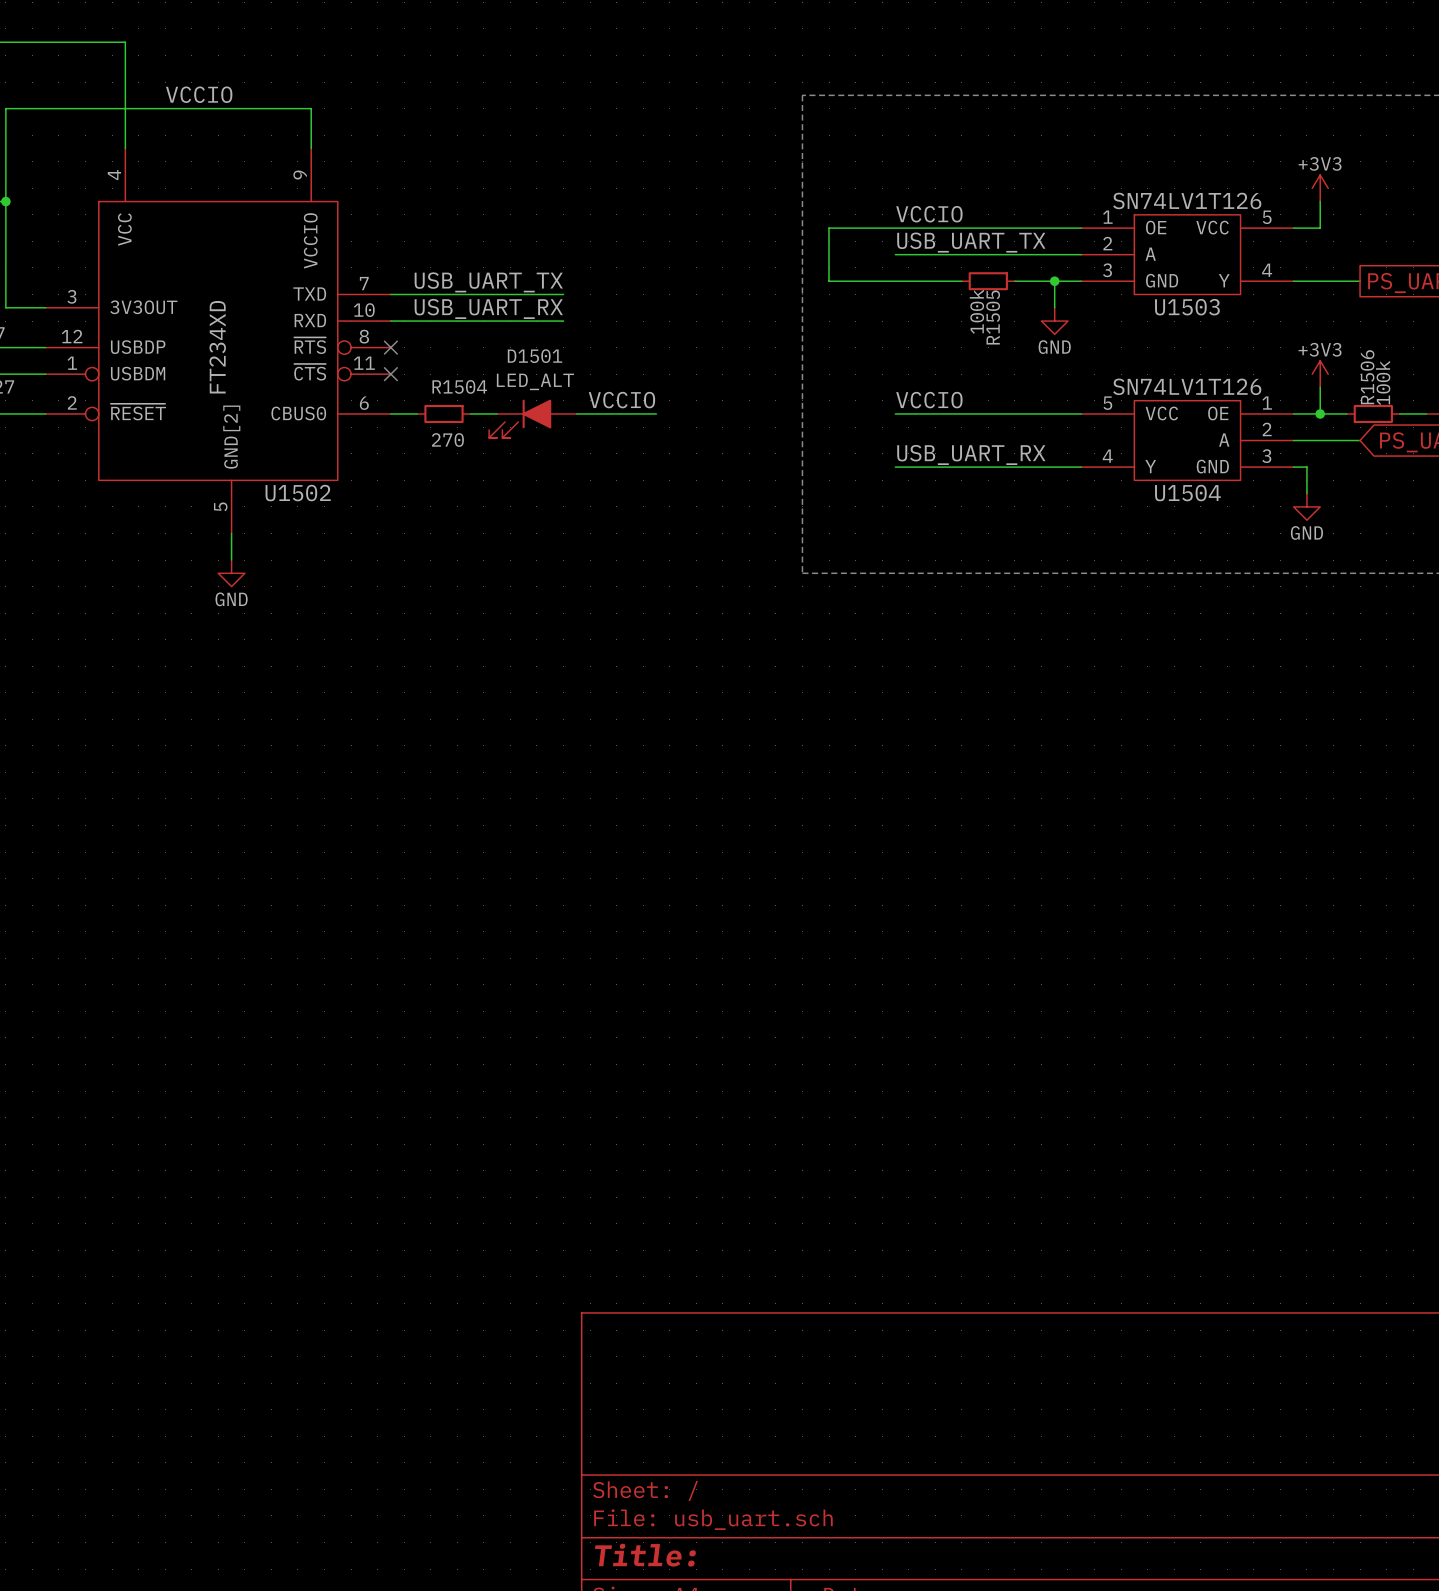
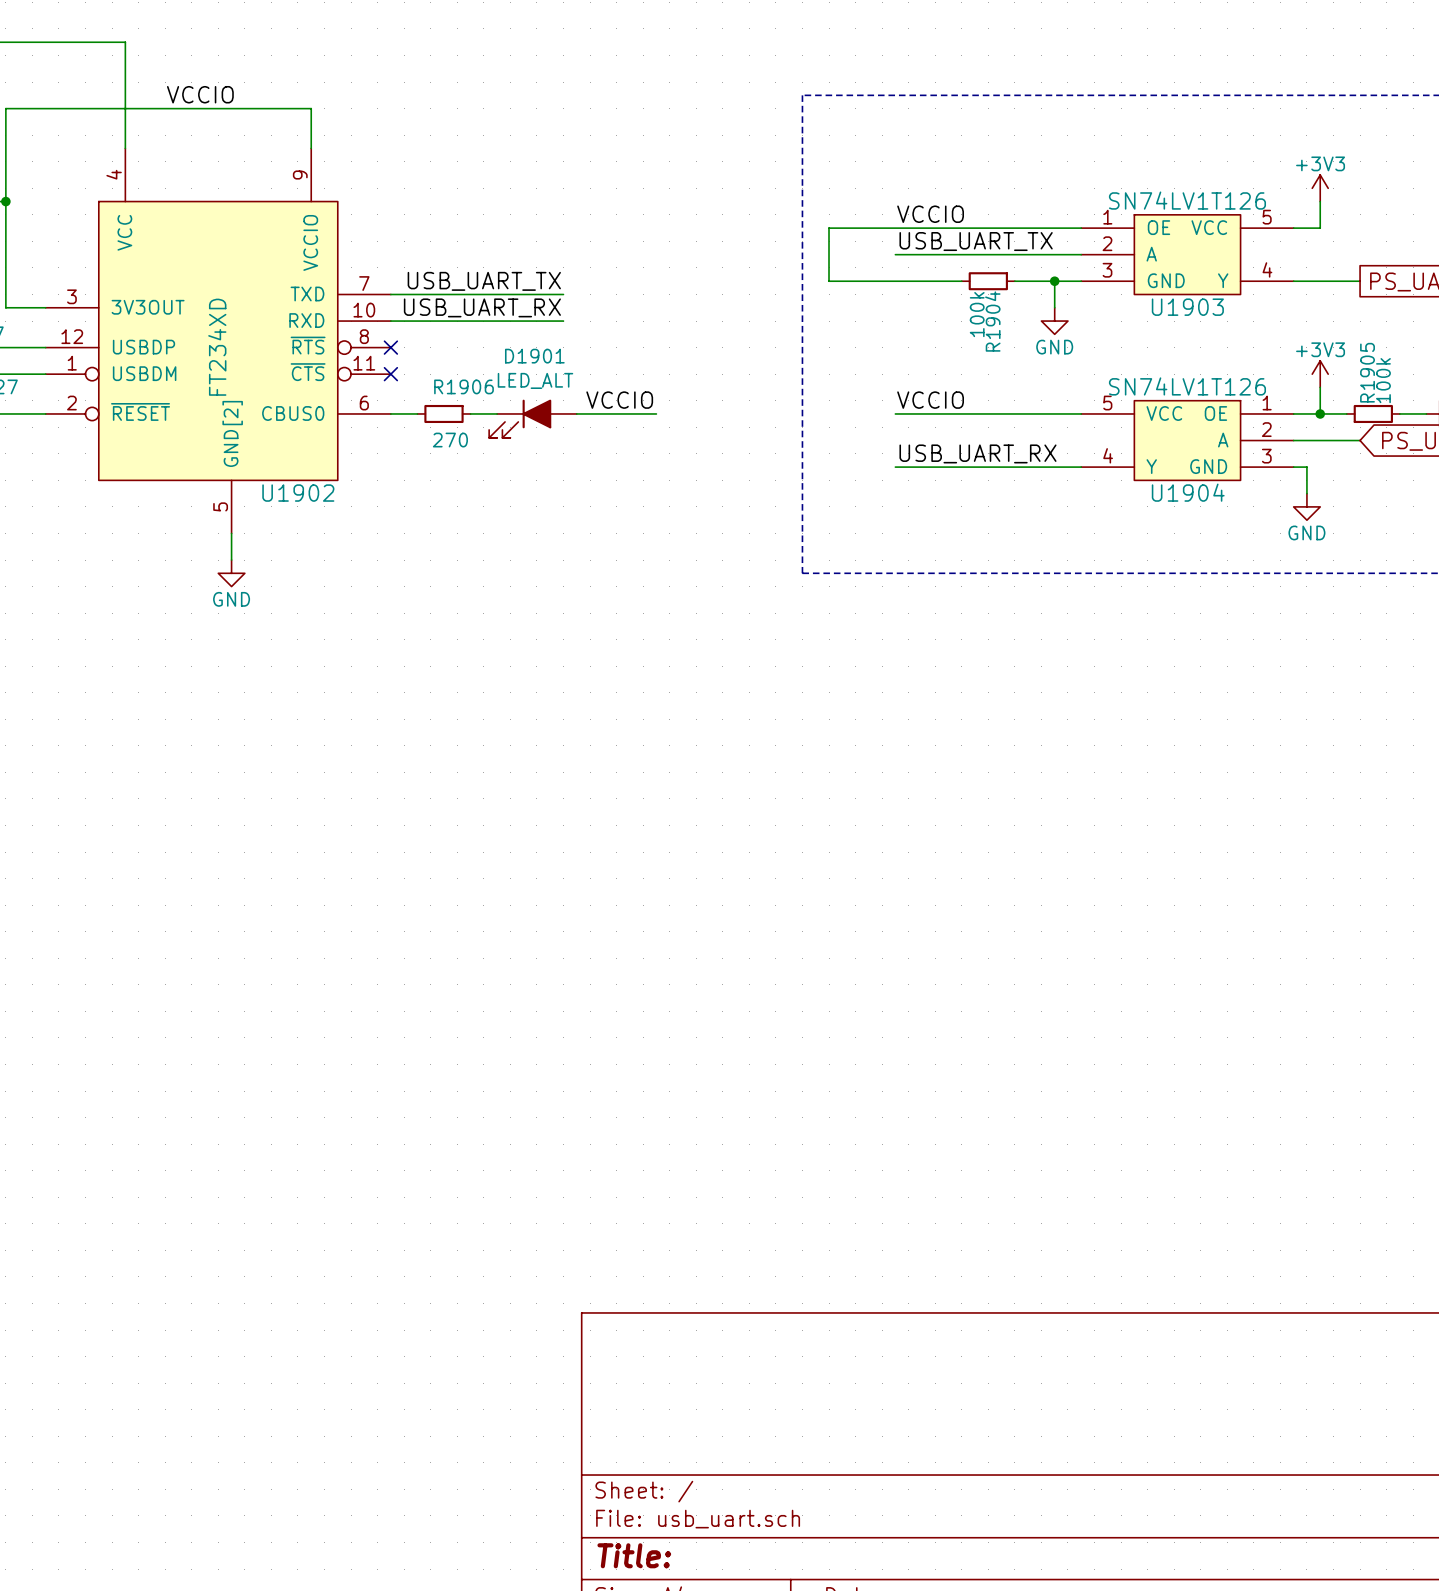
U1503 name: U1503 (1187, 307) -> U1903 (1187, 307)
R1505 name: R1505 (993, 317) -> R1904 (992, 321)
D1501 name: D1501 (534, 356) -> D1901 (534, 356)
R1506 name: R1506 (1367, 377) -> R1905 (1367, 372)
R1504 name: R1504 (459, 386) -> R1906 (464, 386)
U1502 name: U1502 (298, 493) -> U1902 (298, 493)
U1504 name: U1504 (1187, 493) -> U1904 (1188, 492)

